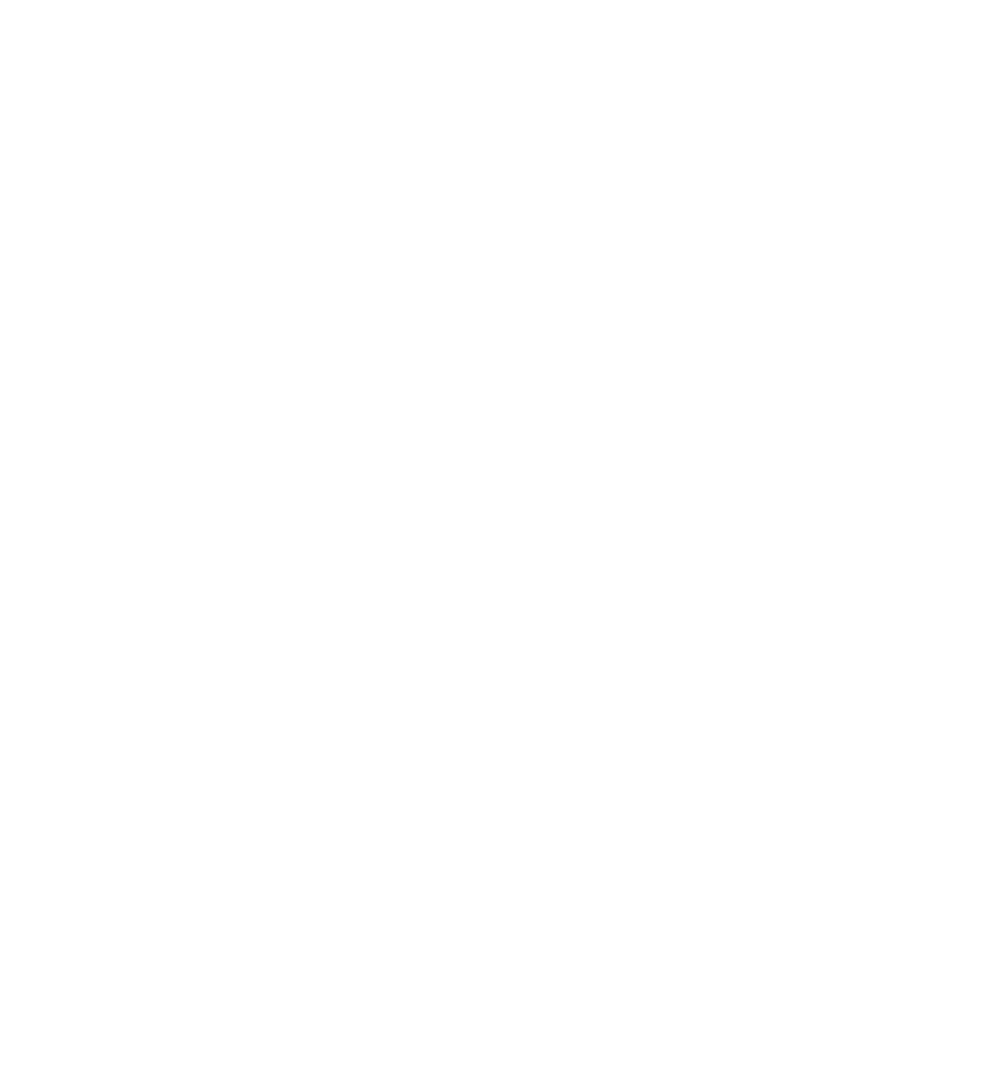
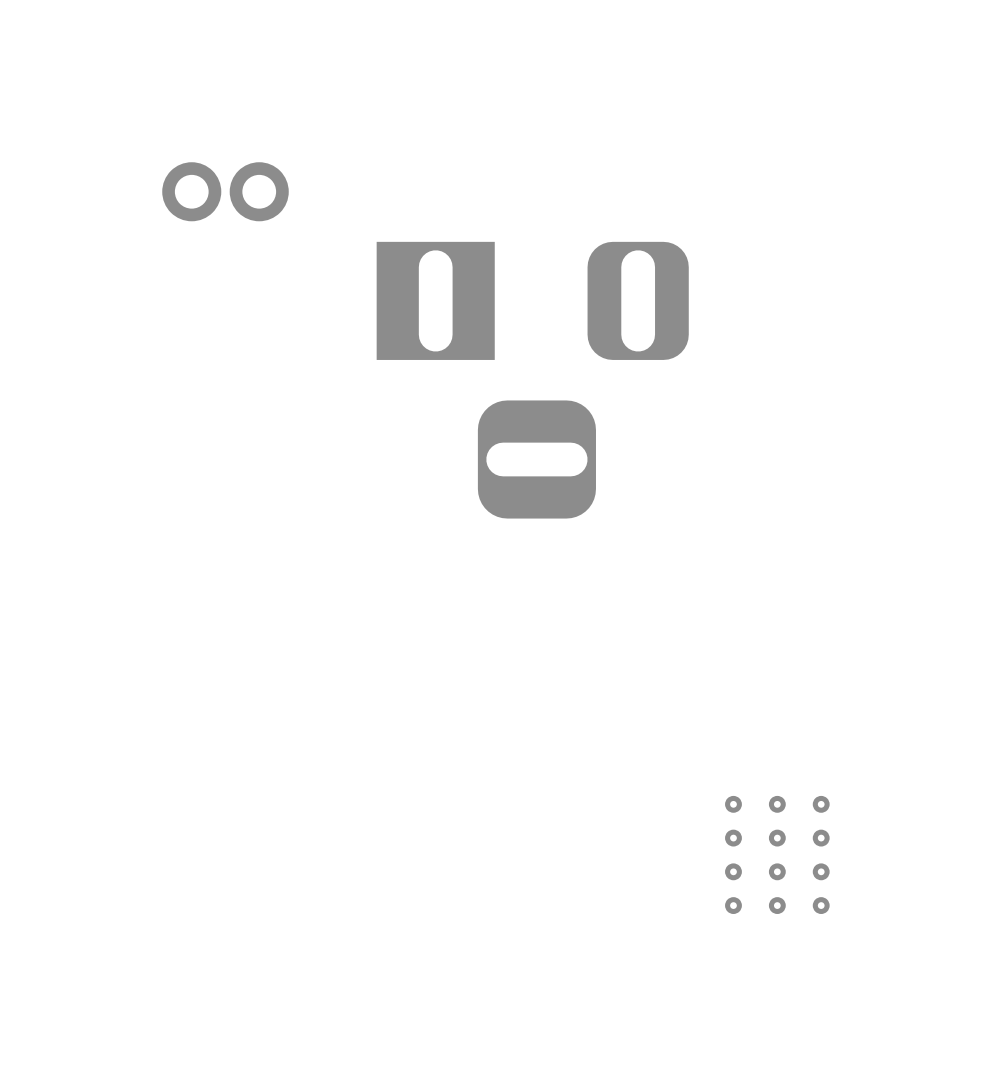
part: none -> (225, 191)
part: none -> (532, 380)
part: none -> (777, 854)

